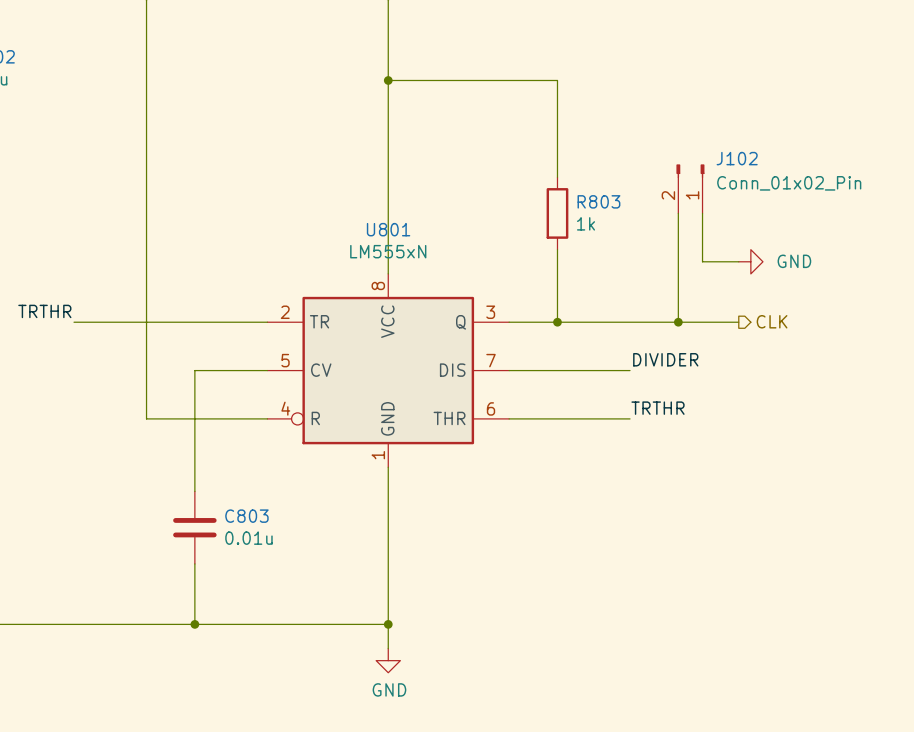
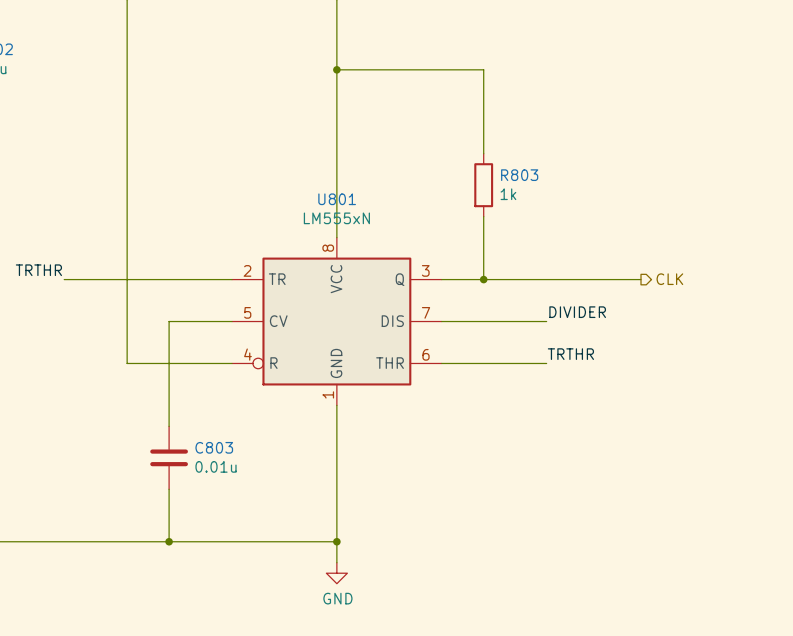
J102: Conn_01x02_Pin (690, 188) -> none
wire: (678, 213) (678, 322) -> none
wire: (702, 213) (702, 261) (738, 261) -> none
power symbol: GND (750, 261) -> none
junction: (678, 322) -> none

